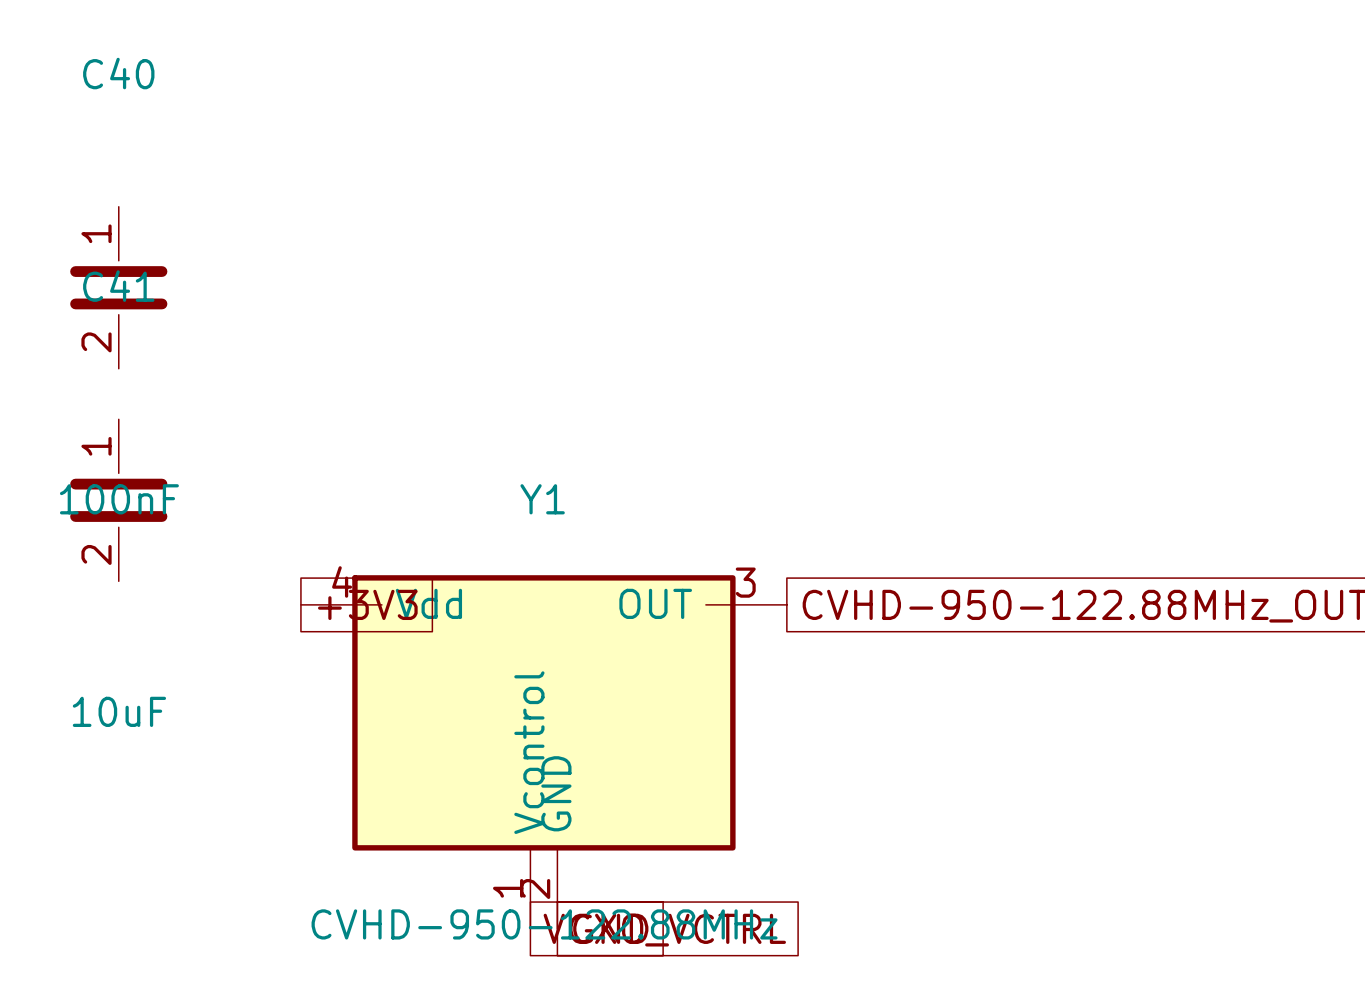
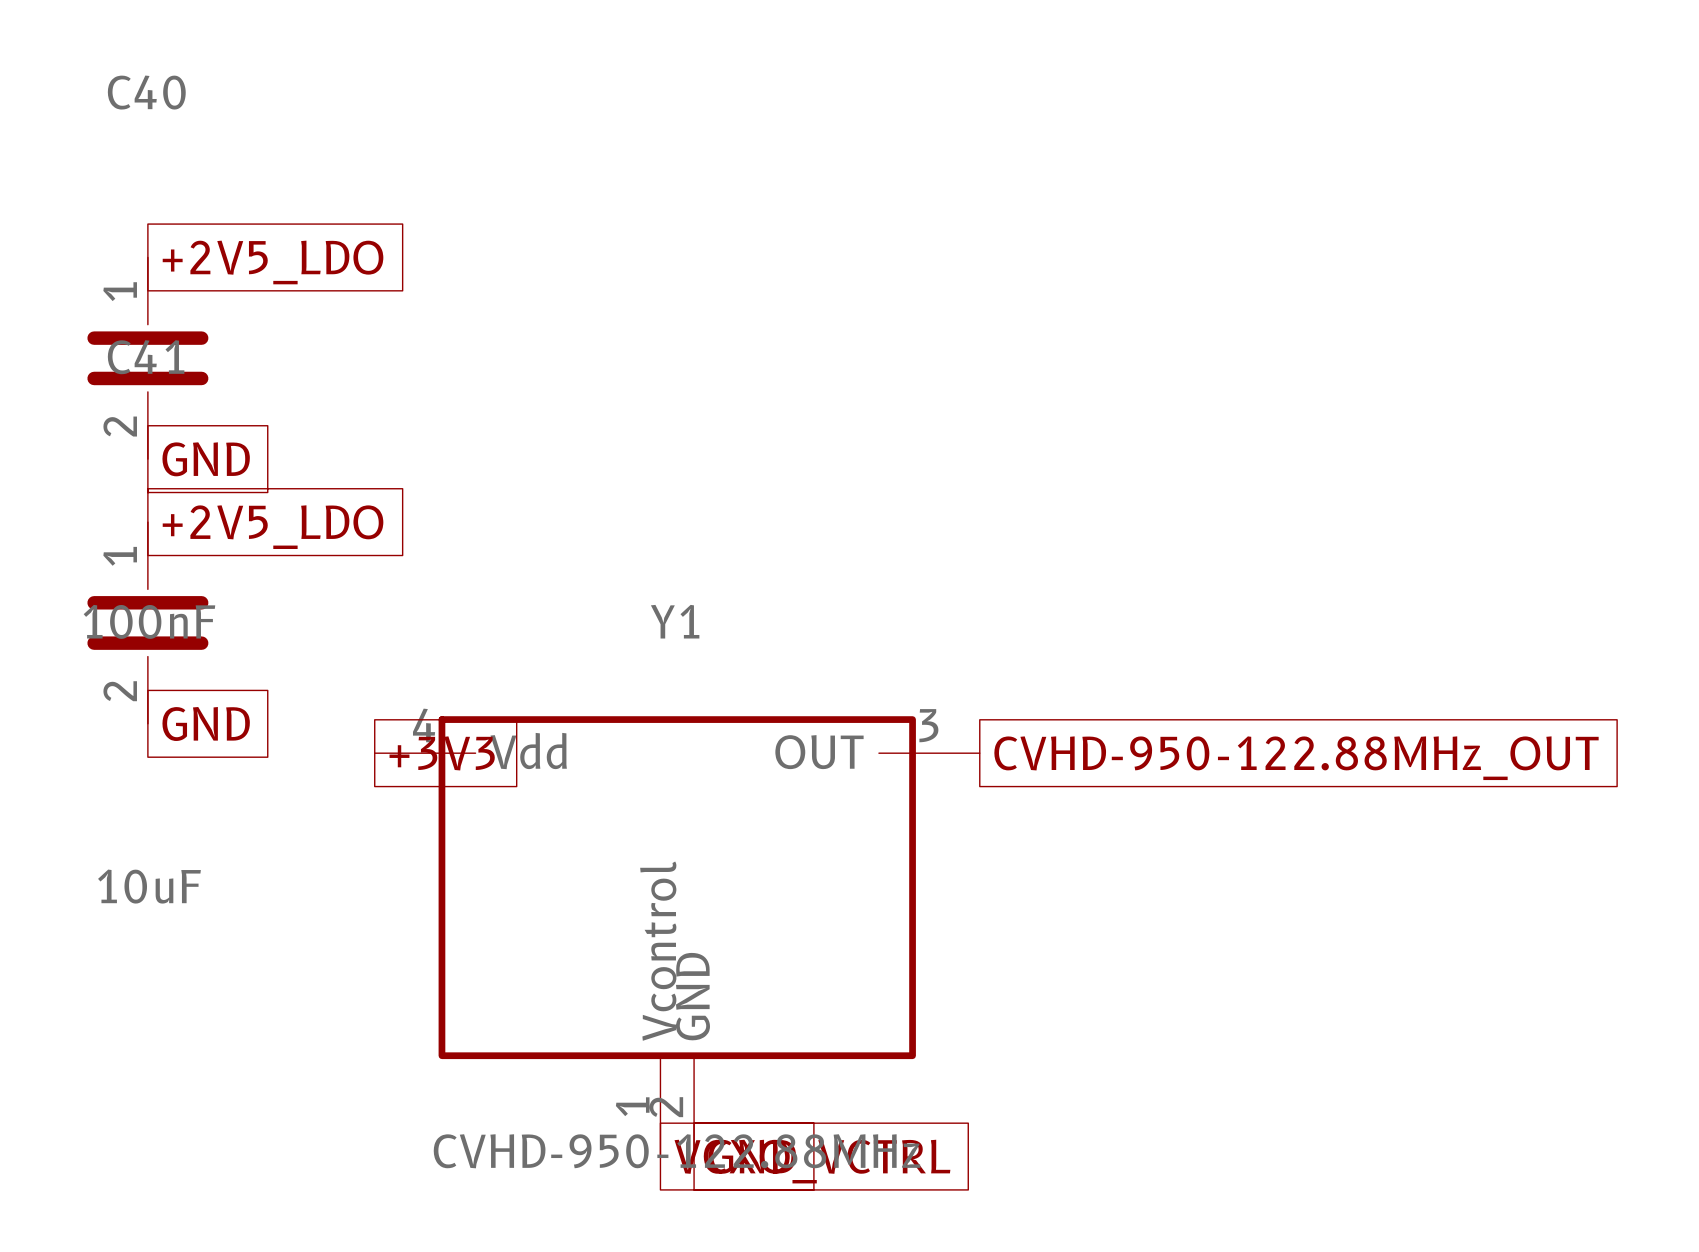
global label: none -> +2V5_LDO (273, 262)
global label: none -> GND (206, 459)
global label: none -> +2V5_LDO (273, 527)
global label: none -> GND (206, 723)

